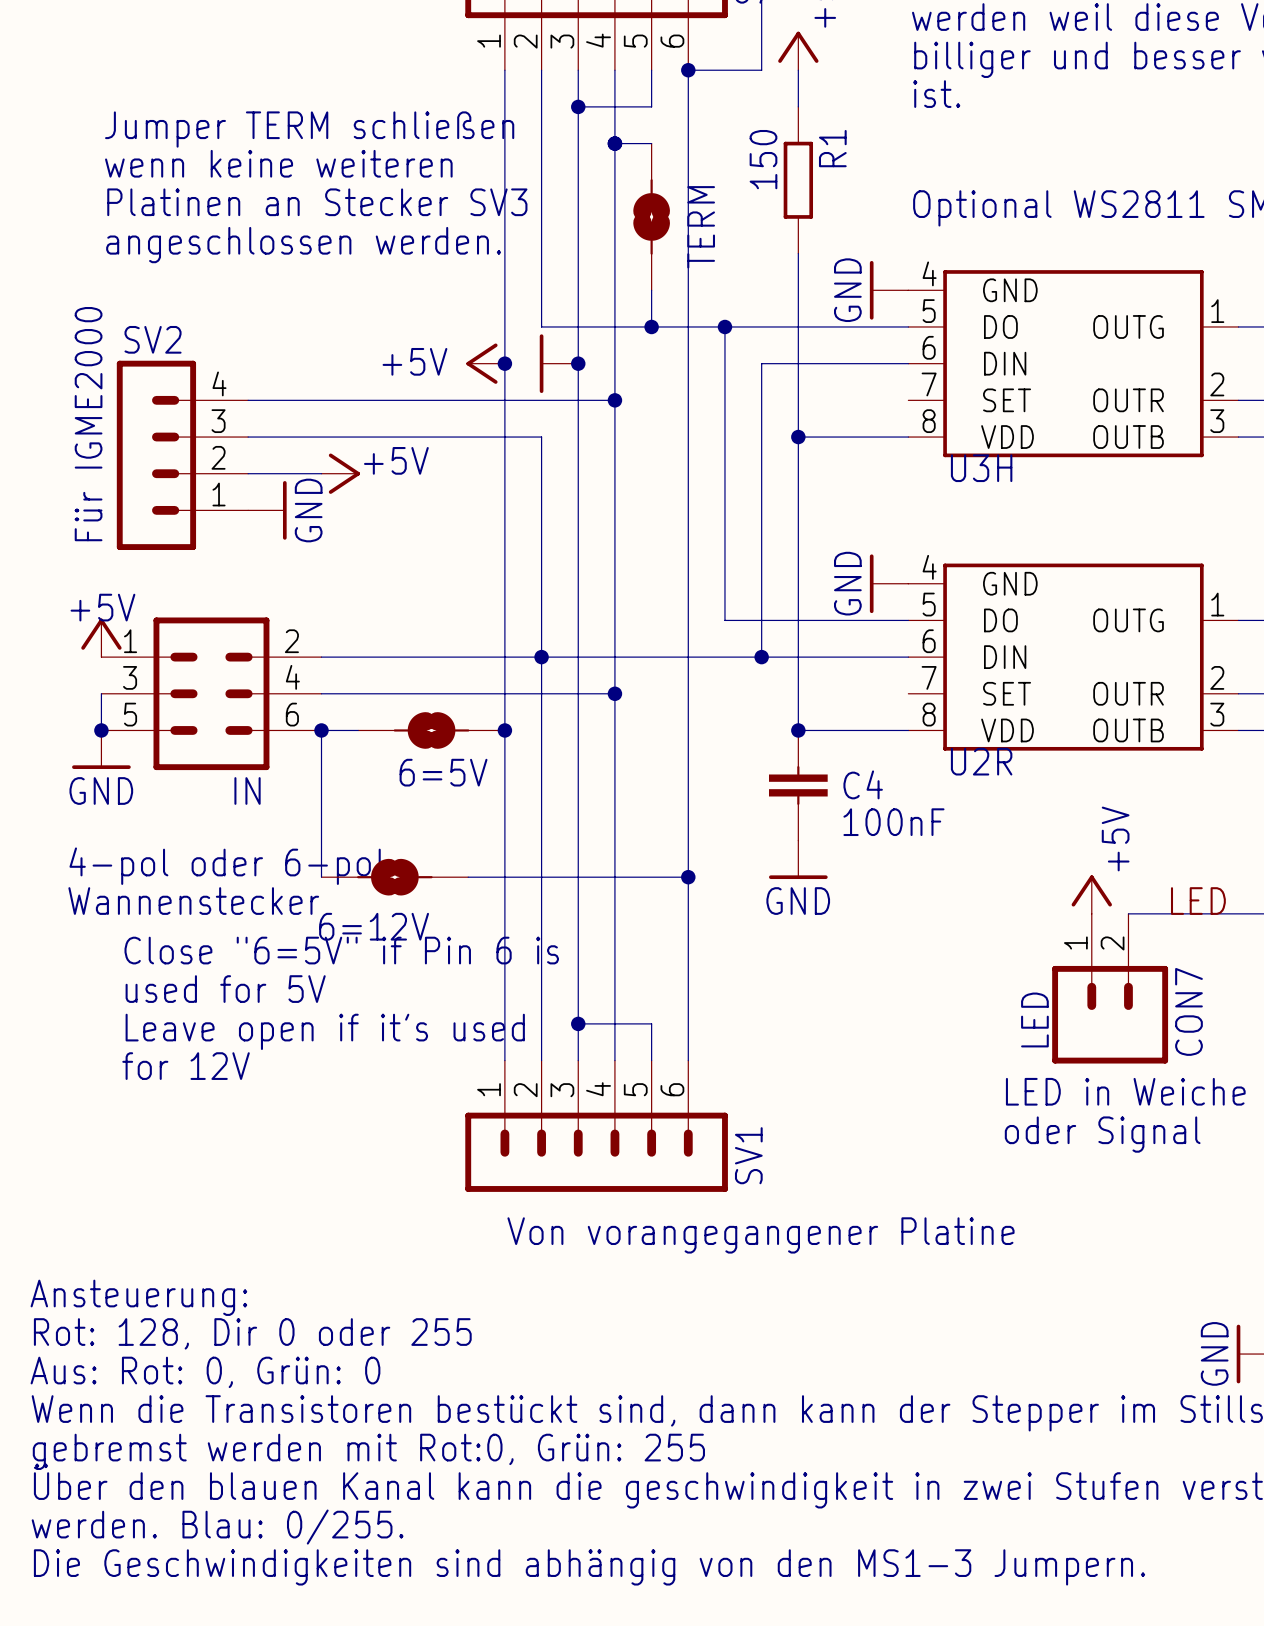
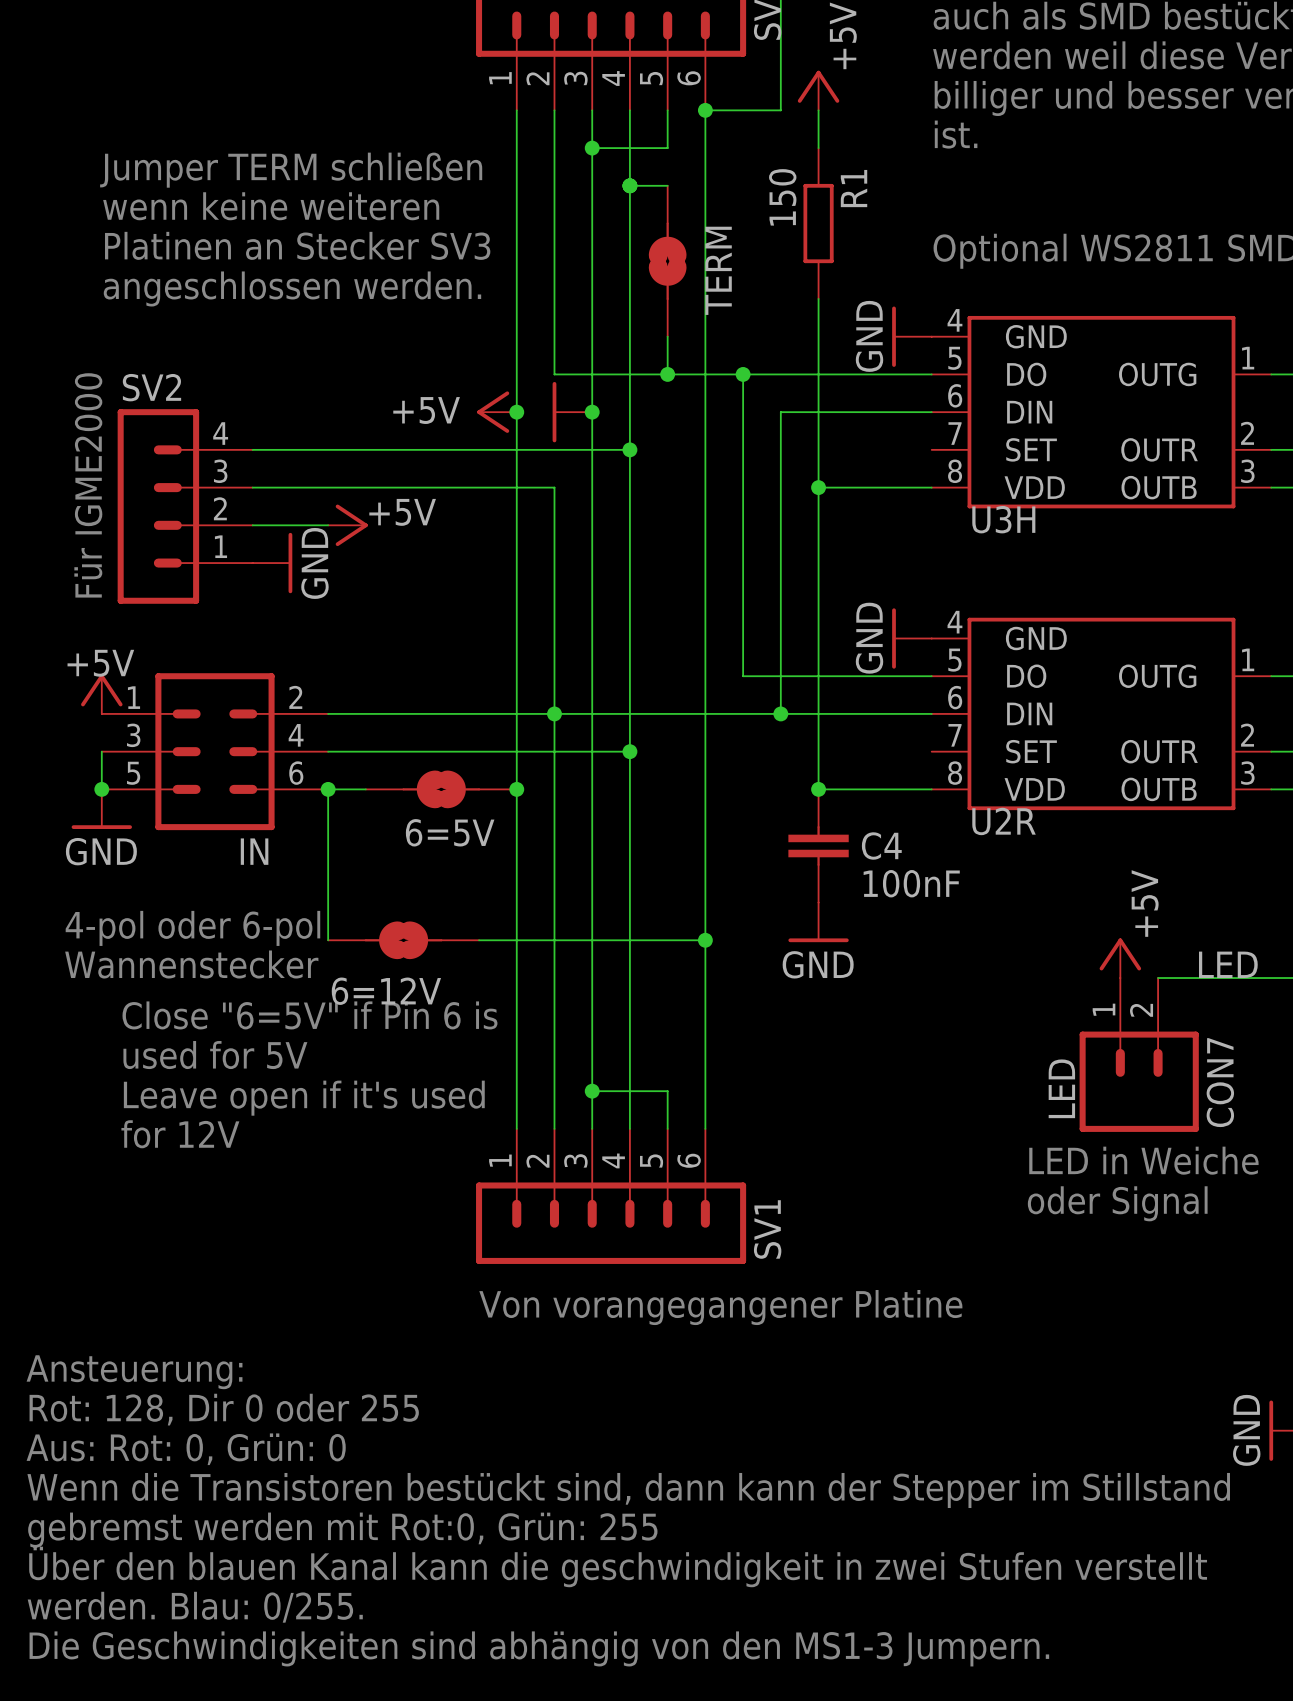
text position: Von vorangegangener Platine (760, 1235) -> Von vorangegangener Platine (720, 1307)

